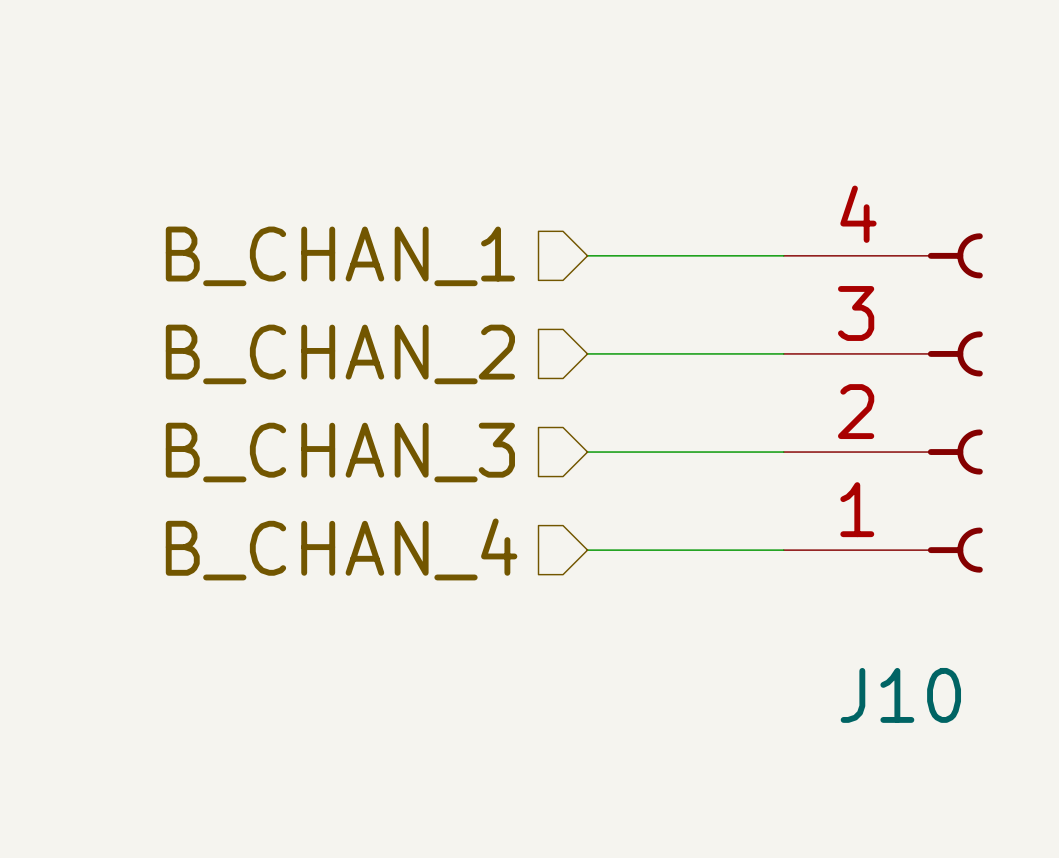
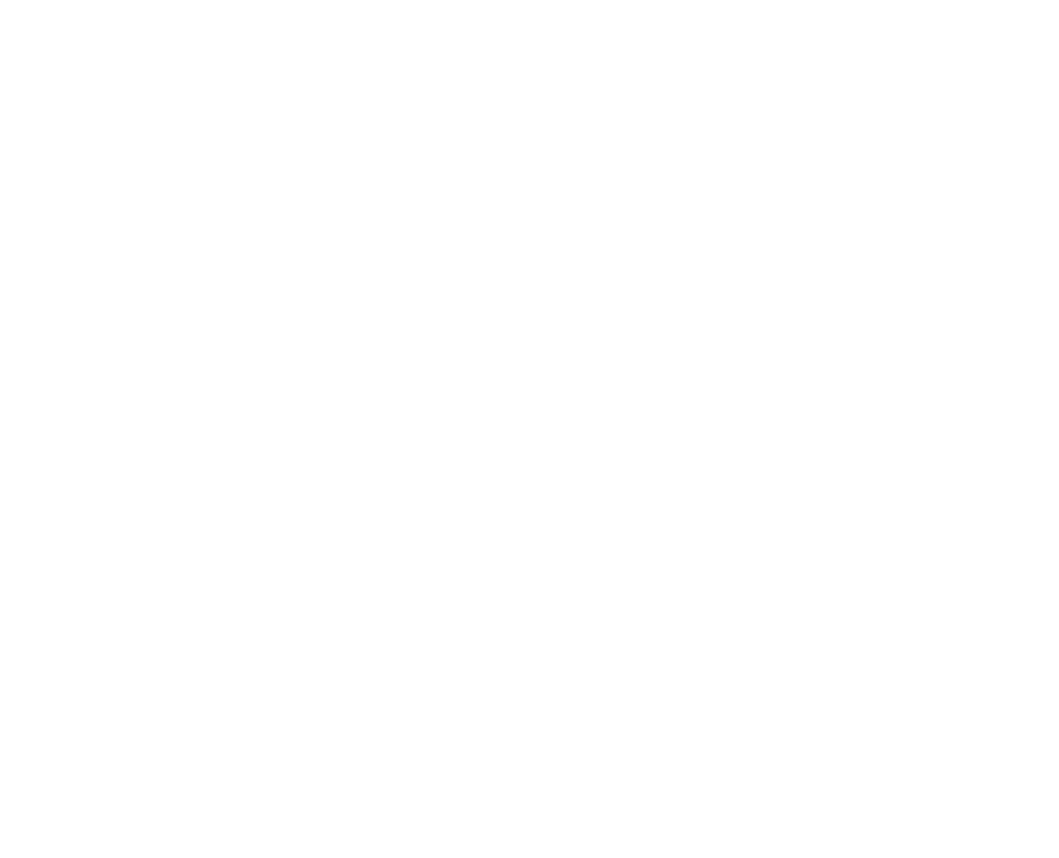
wire: (587, 255) (783, 255) -> none
hierarchical label: B_CHAN_1 (340, 256) -> none
wire: (587, 353) (783, 353) -> none
hierarchical label: B_CHAN_2 (340, 354) -> none
J10: (883, 402) -> none
hierarchical label: B_CHAN_3 (340, 452) -> none
wire: (587, 452) (783, 452) -> none
hierarchical label: B_CHAN_4 (341, 549) -> none
wire: (587, 550) (783, 550) -> none

